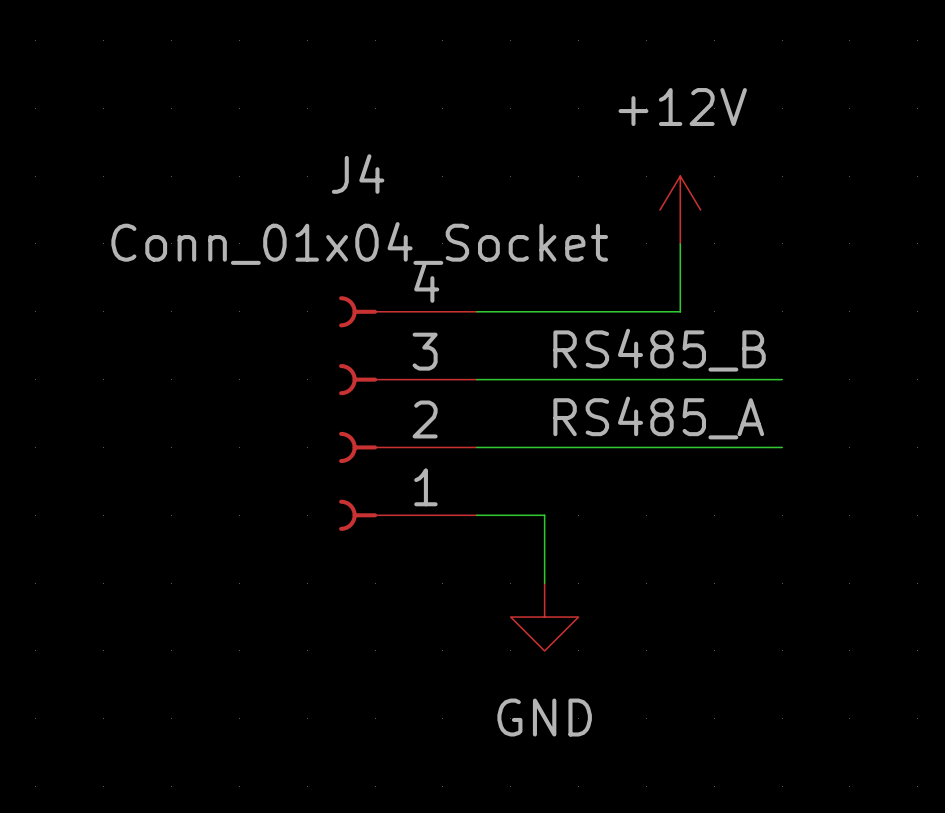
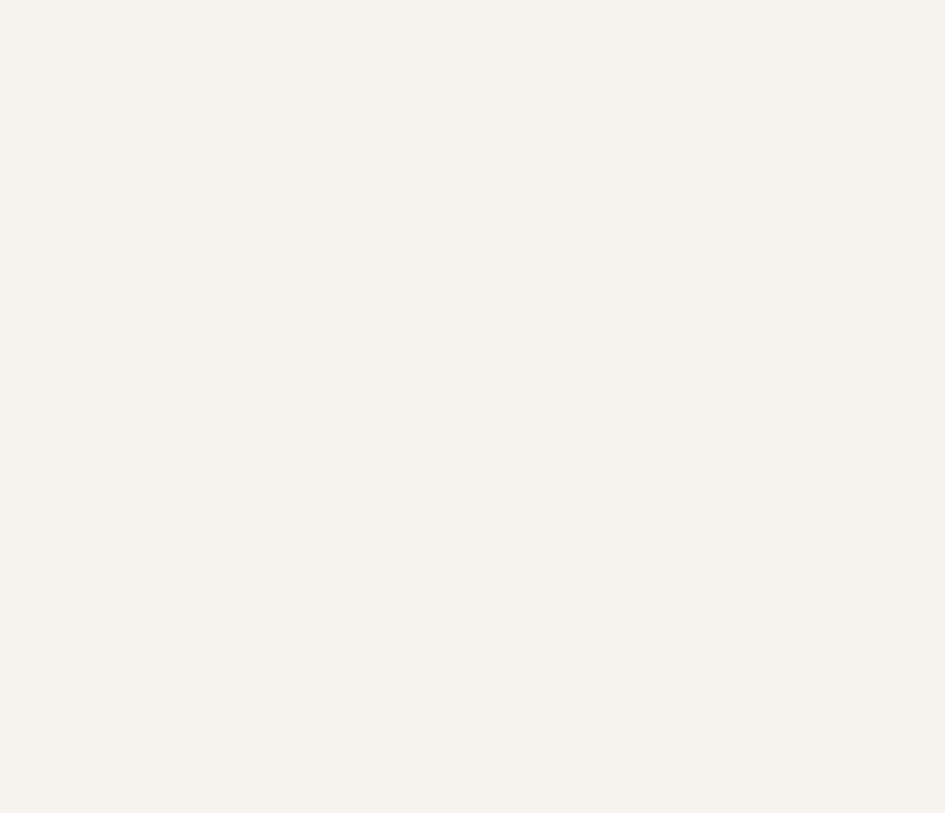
power symbol: +12V (680, 210) -> none
wire: (680, 243) (680, 311) (476, 311) -> none
label: RS485_B (659, 350) -> none
wire: (476, 379) (782, 379) -> none
J4: Conn_01x04_Socket (407, 413) -> none
label: RS485_A (658, 417) -> none
wire: (476, 447) (782, 447) -> none
wire: (476, 515) (544, 515) (544, 583) -> none
power symbol: GND (544, 617) -> none

